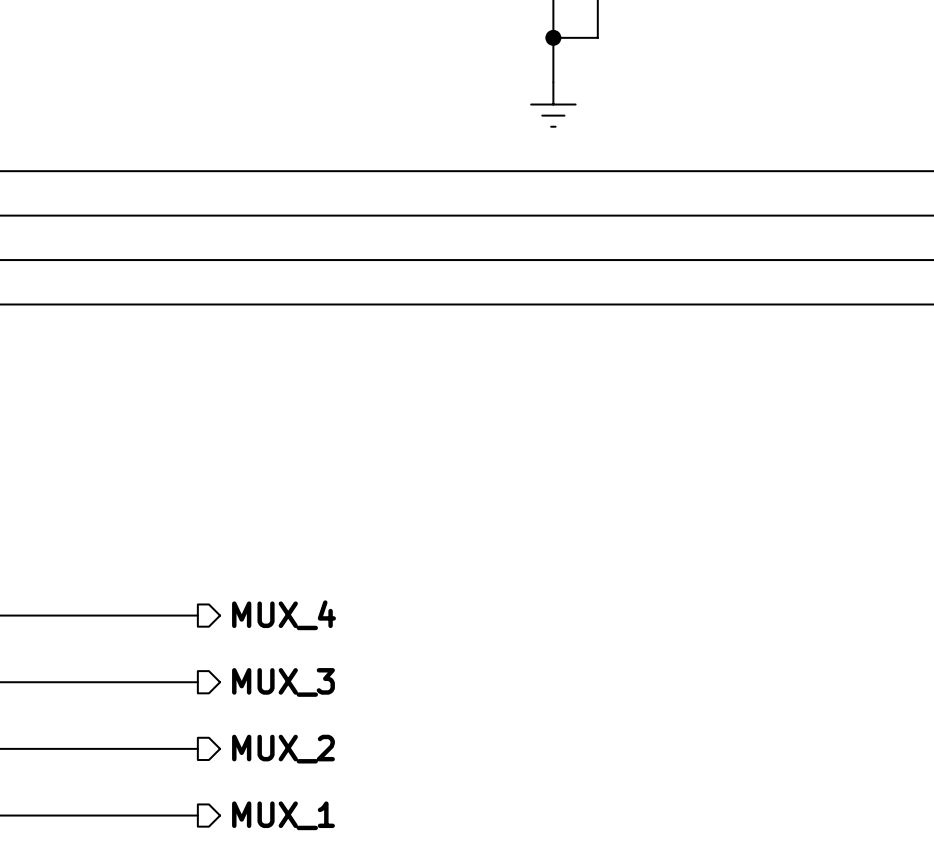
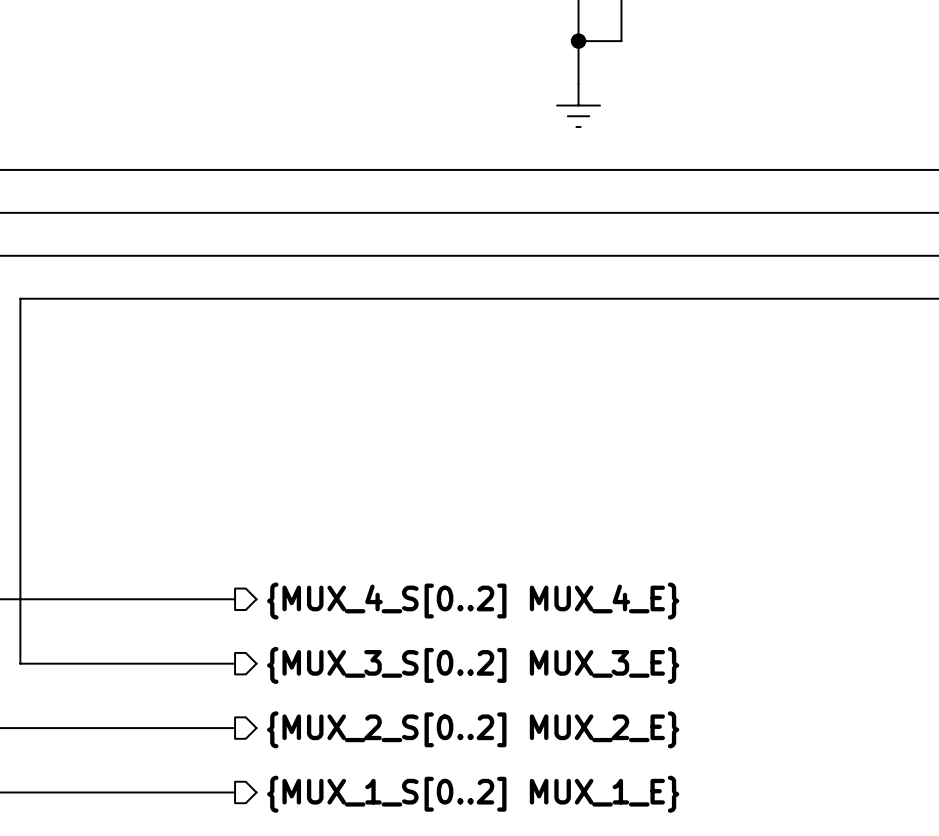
hierarchical label: MUX_4 (284, 615) -> {MUX_4_S[0..2] MUX_4_E} (473, 601)
hierarchical label: MUX_3 (283, 682) -> {MUX_3_S[0..2] MUX_3_E} (473, 665)
hierarchical label: MUX_2 (283, 749) -> {MUX_2_S[0..2] MUX_2_E} (473, 729)
hierarchical label: MUX_1 (283, 815) -> {MUX_1_S[0..2] MUX_1_E} (473, 794)

